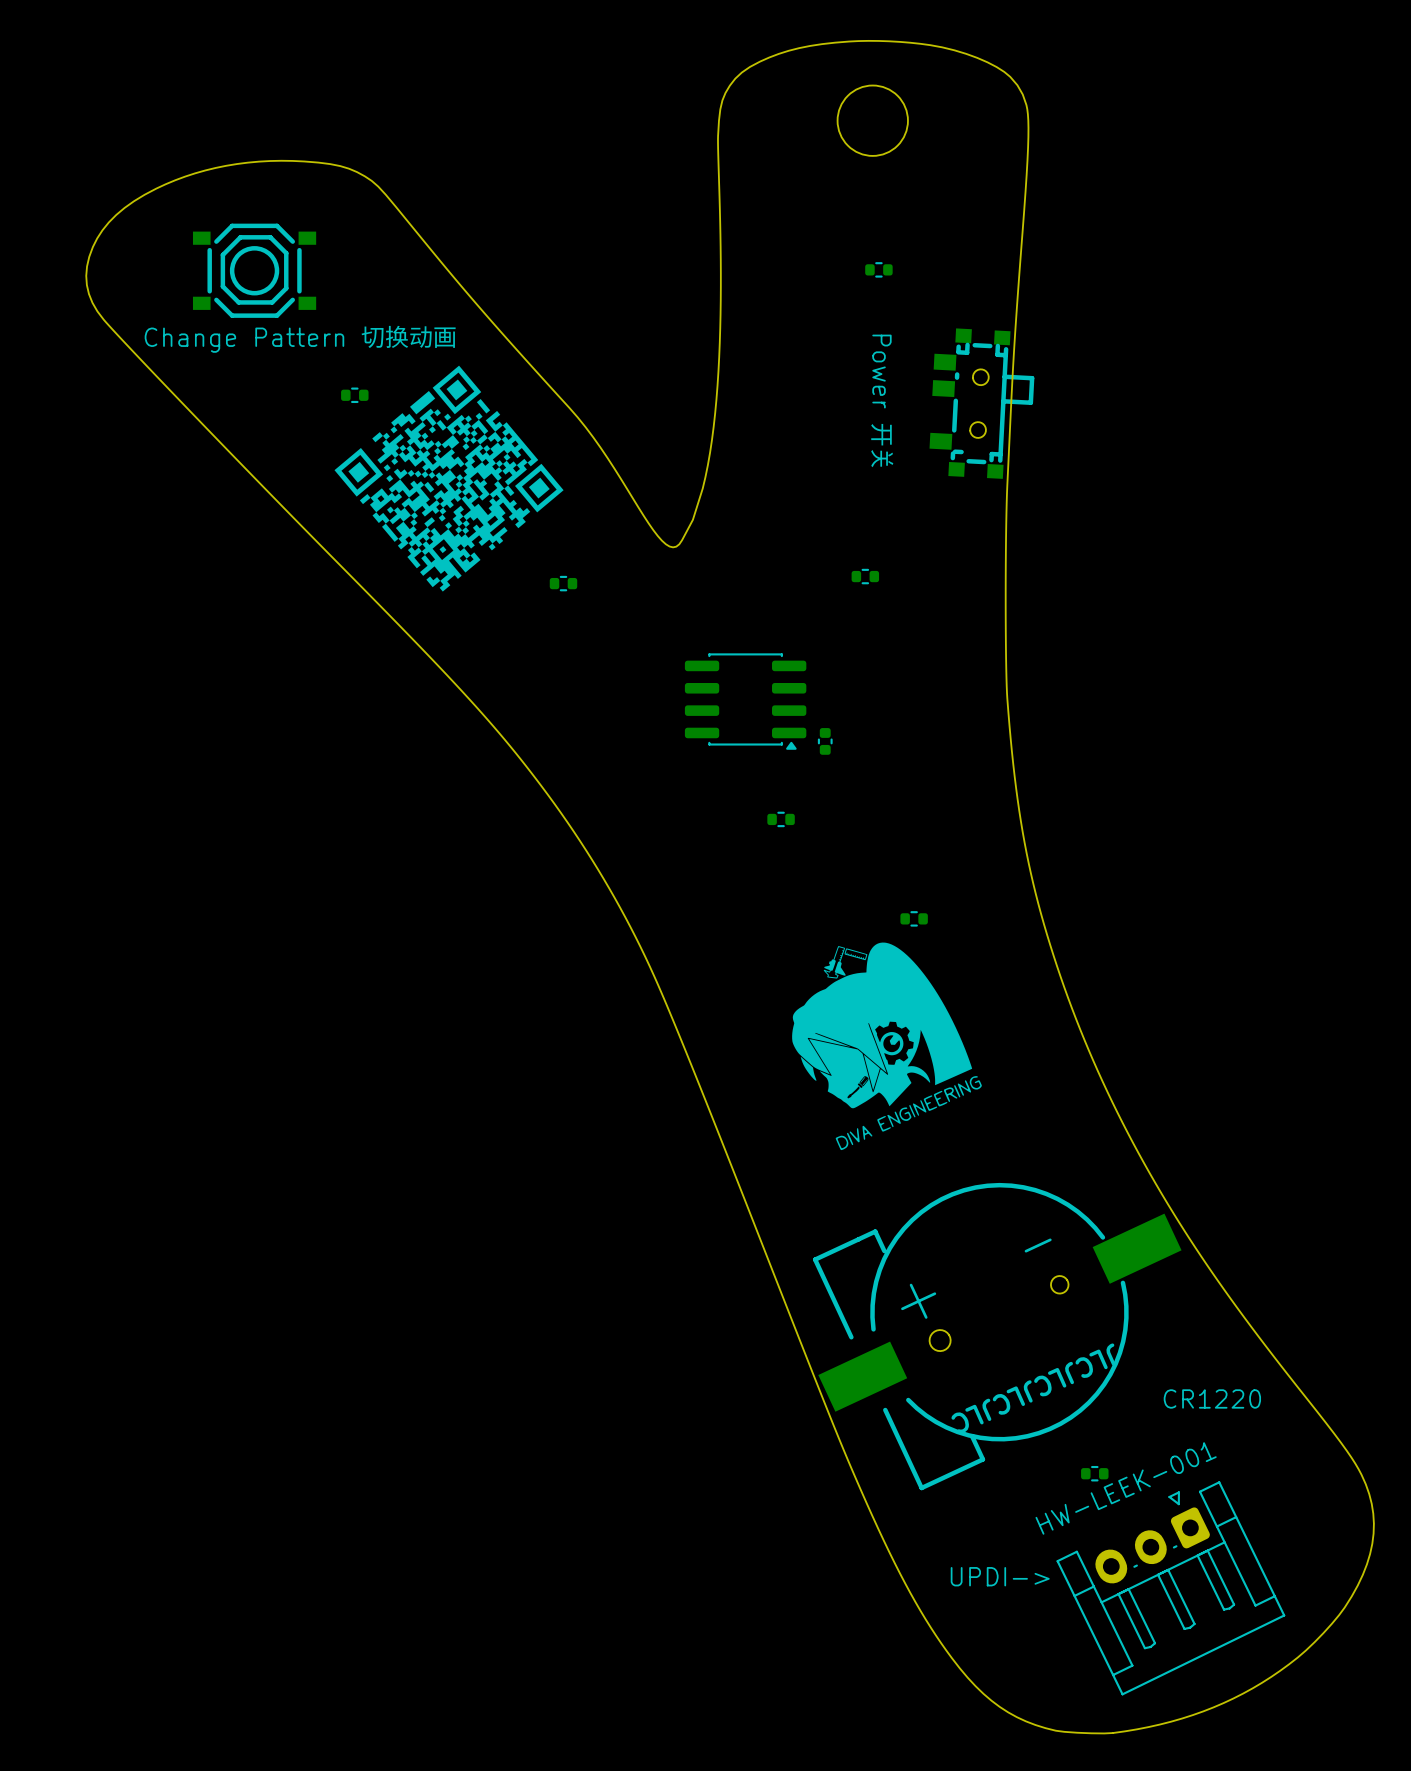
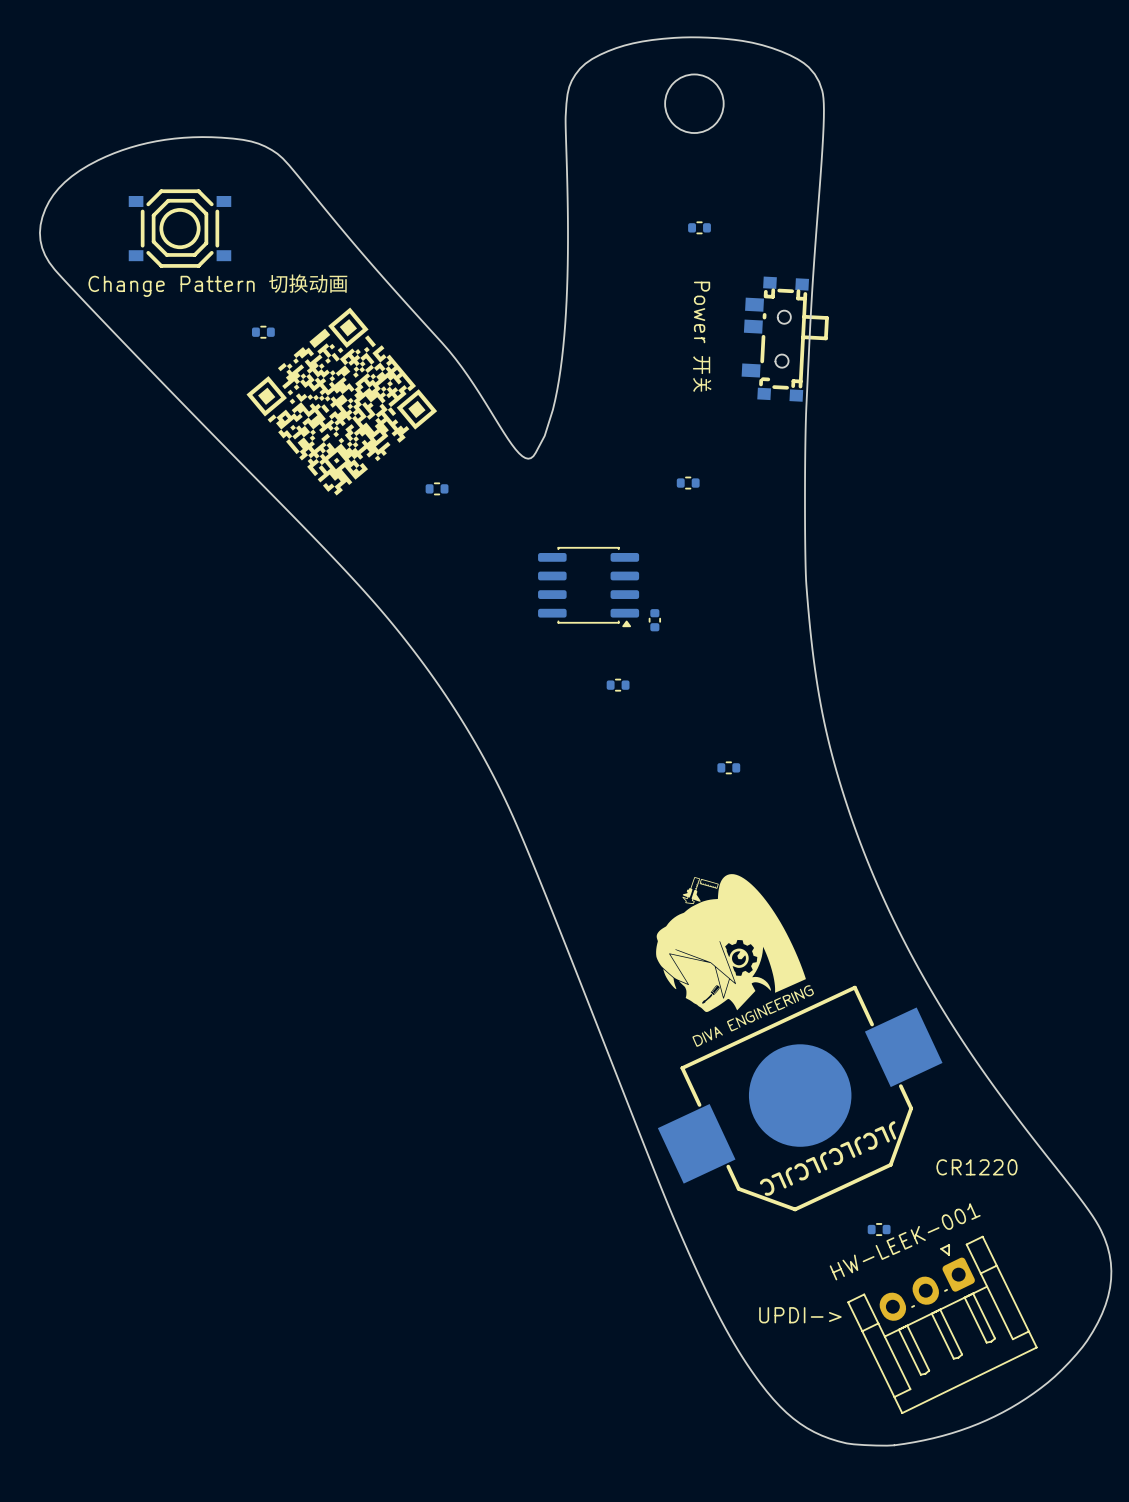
drawing position: (886, 1046) -> (735, 960)
part: none -> (800, 1098)
part: (997, 1336) -> none

